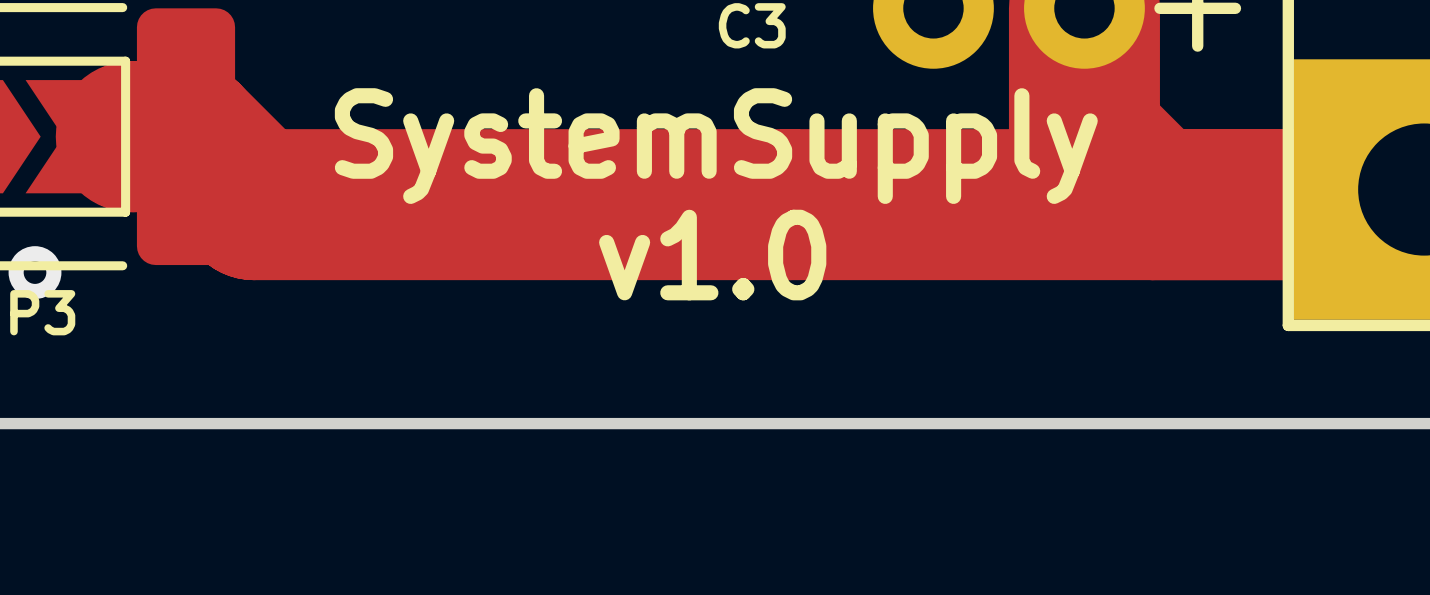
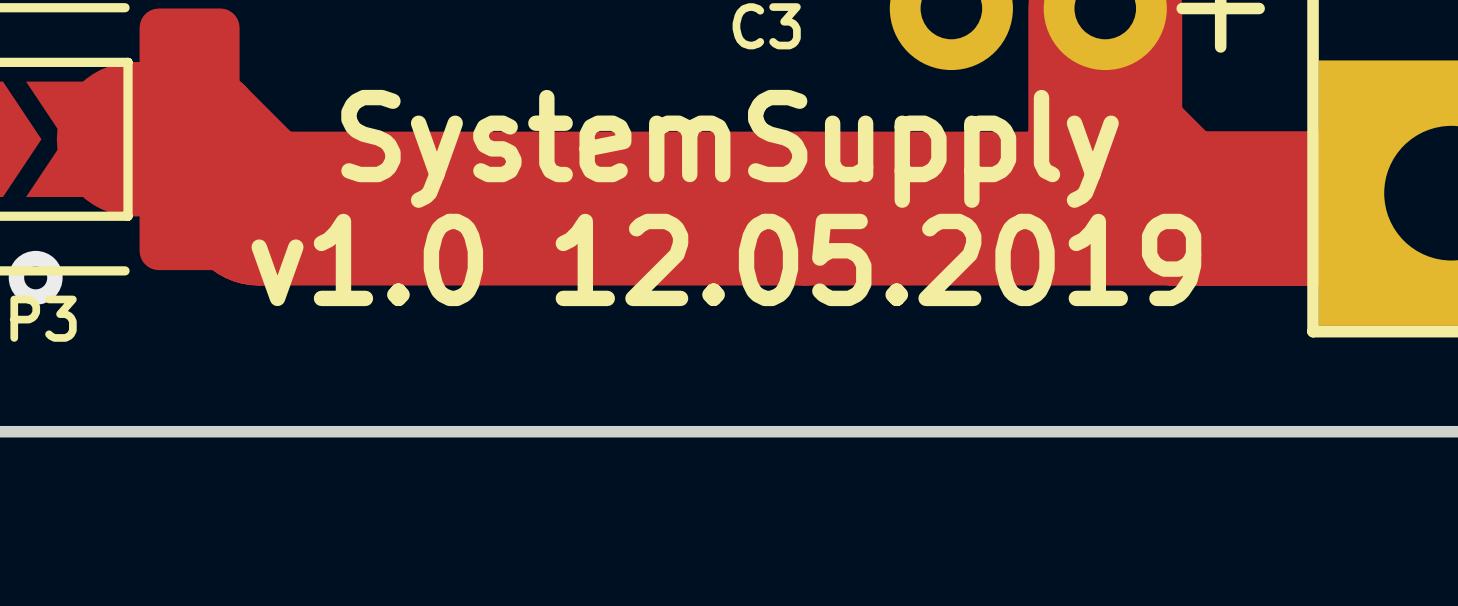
text: v1.0 (712, 255) -> v1.0 12.05.2019 (726, 259)

